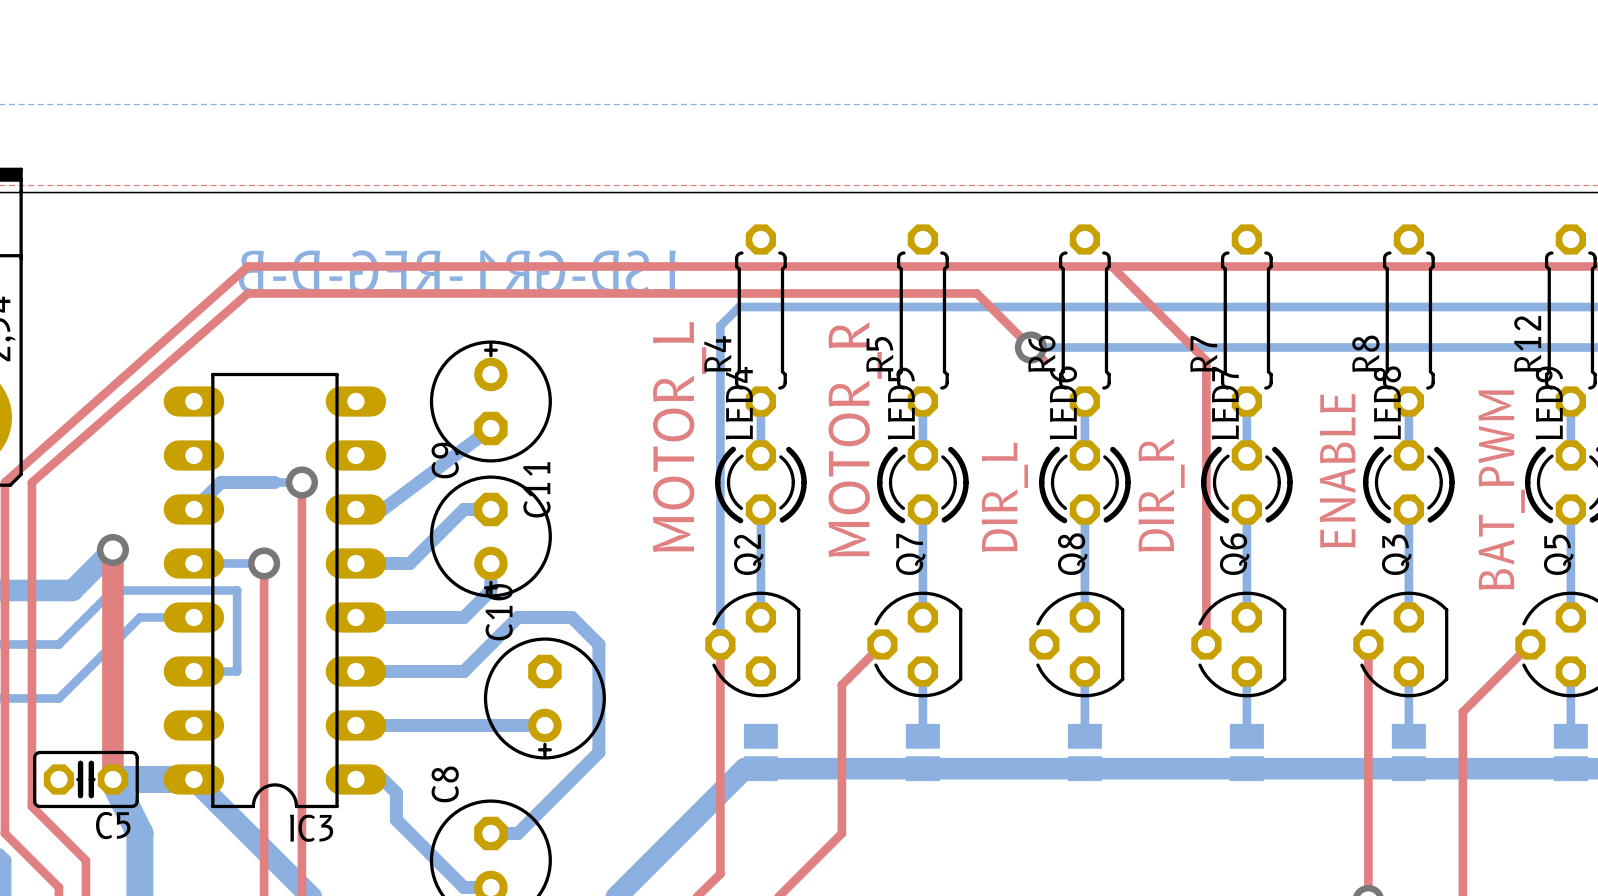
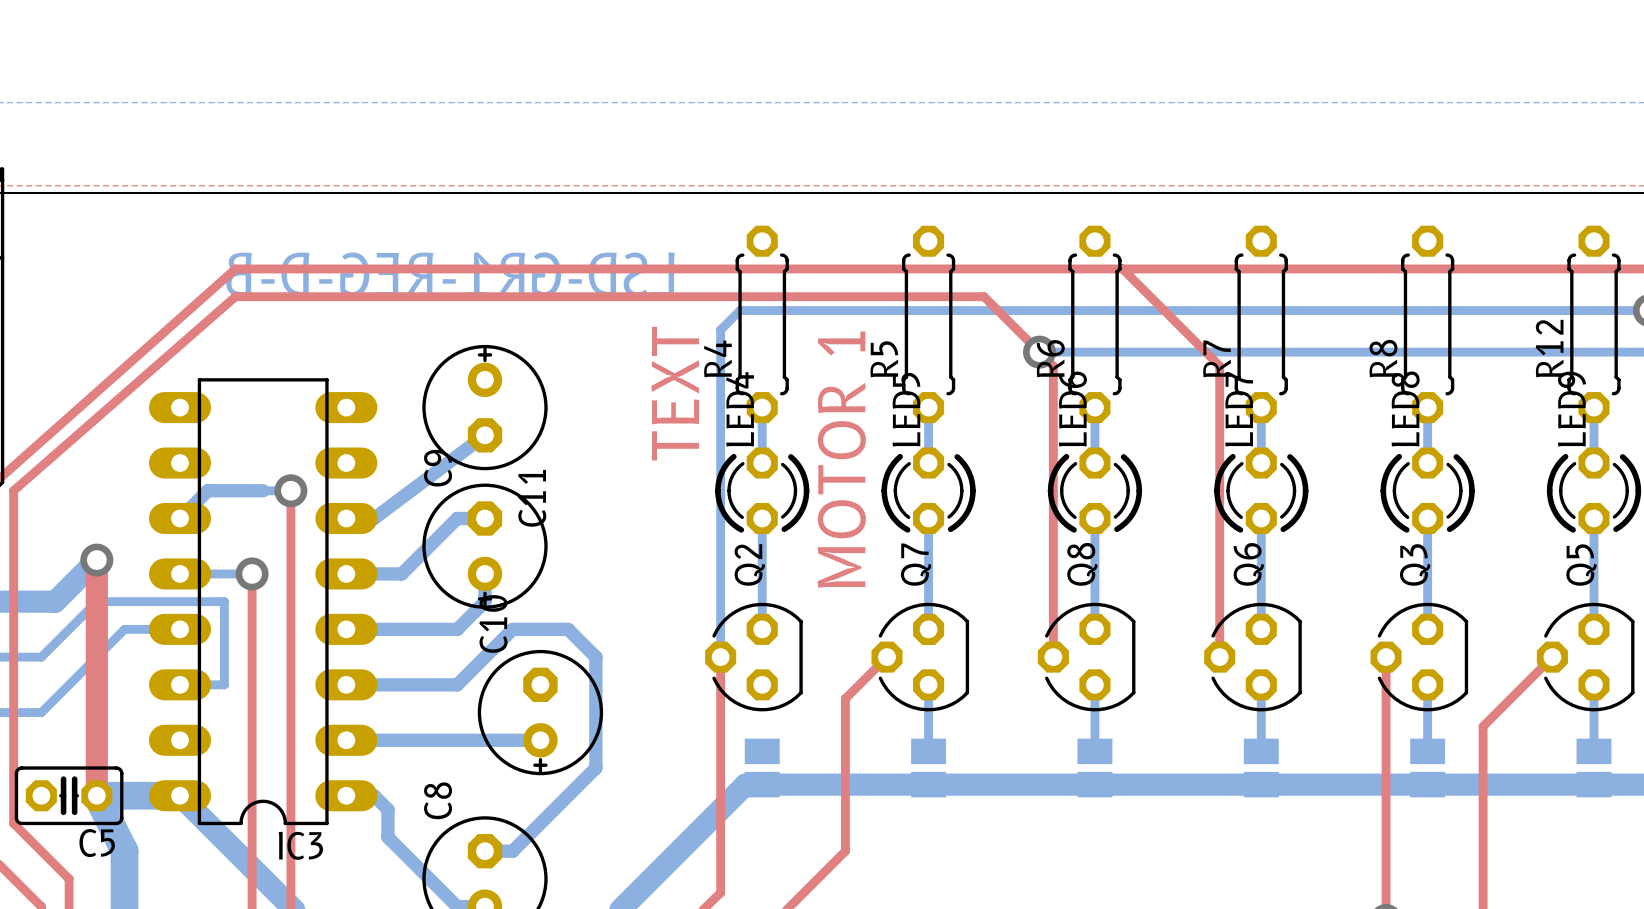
top track: none -> (1053, 365) (1053, 657)
text: MOTOR_L (679, 436) -> TEXT (675, 393)
text: MOTOR_R (855, 439) -> MOTOR 1 (841, 459)
text: ENABLE (1337, 470) -> none
text: BAT_PWM (1501, 490) -> none
text: DIR_R (1161, 495) -> none
text: DIR_L (1004, 497) -> none

